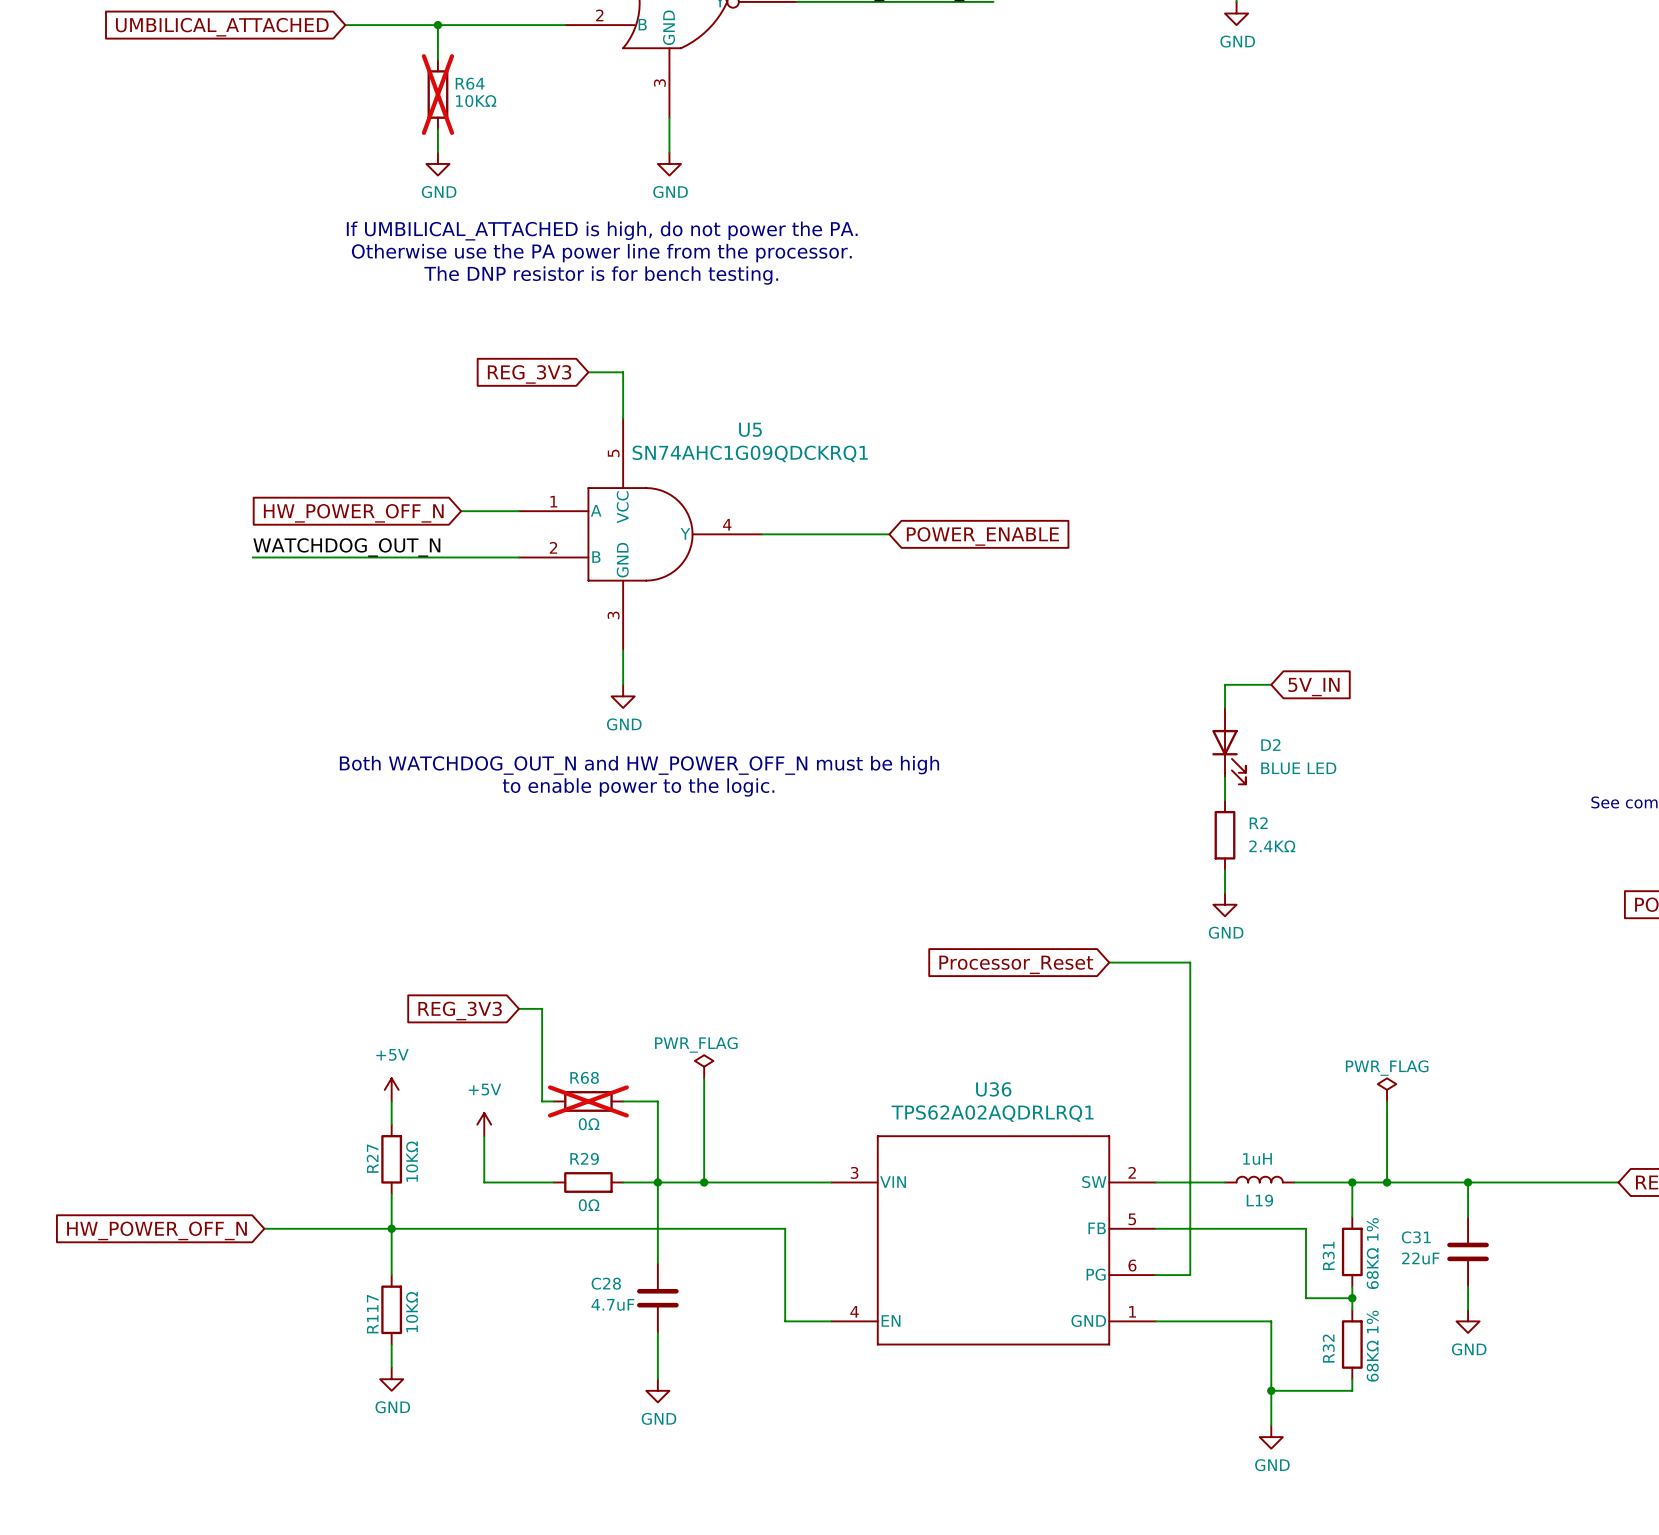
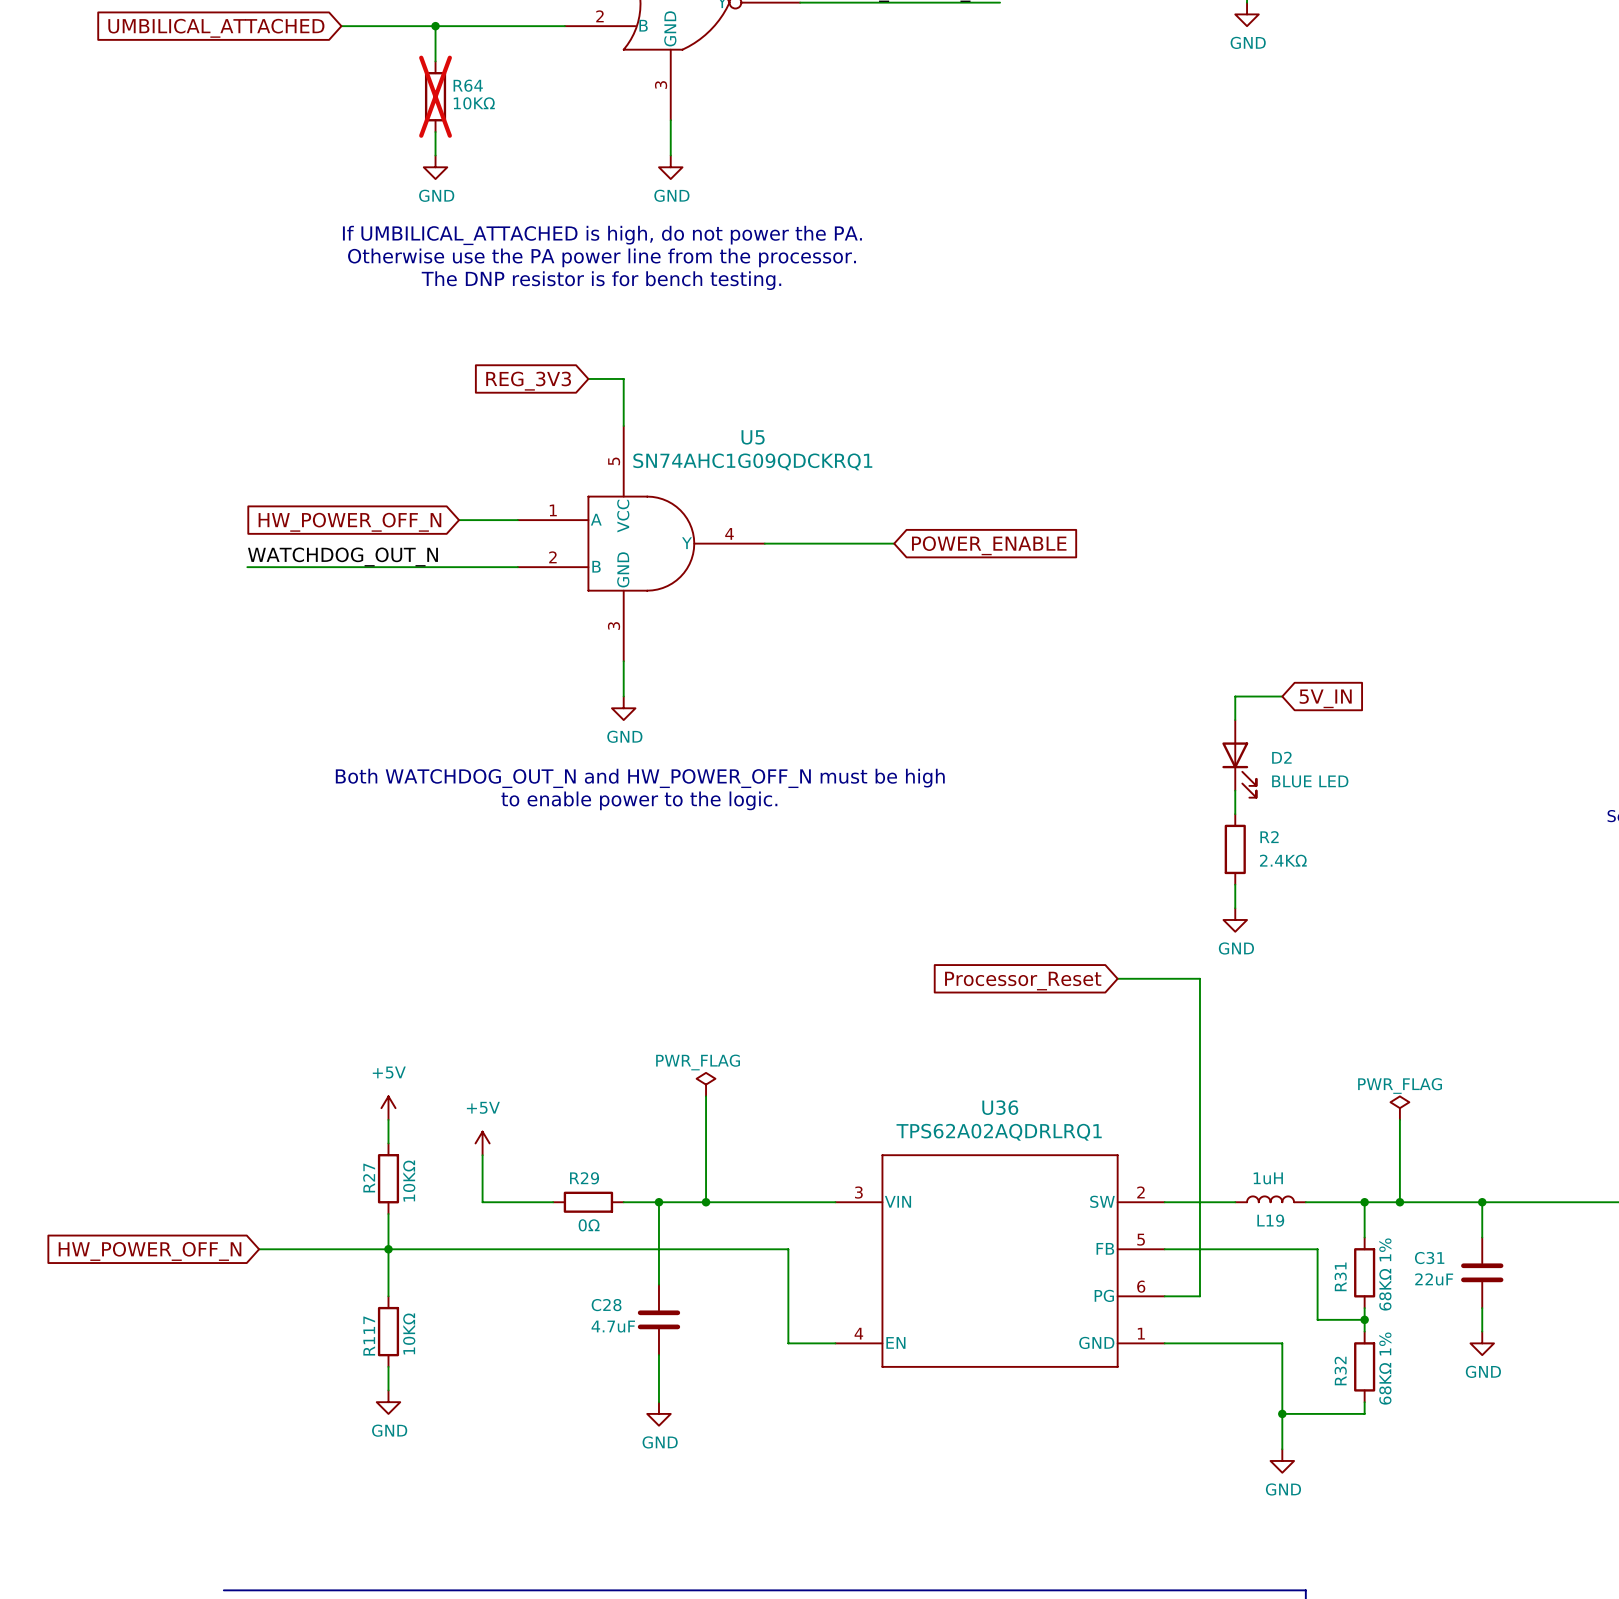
wire: (518, 1008) (542, 1008) (542, 1101) (553, 1101) -> none
global label: REG_3V3 (460, 1011) -> none
R68: 0Ω (588, 1101) -> none
wire: (623, 1101) (657, 1101) (657, 1182) -> none

